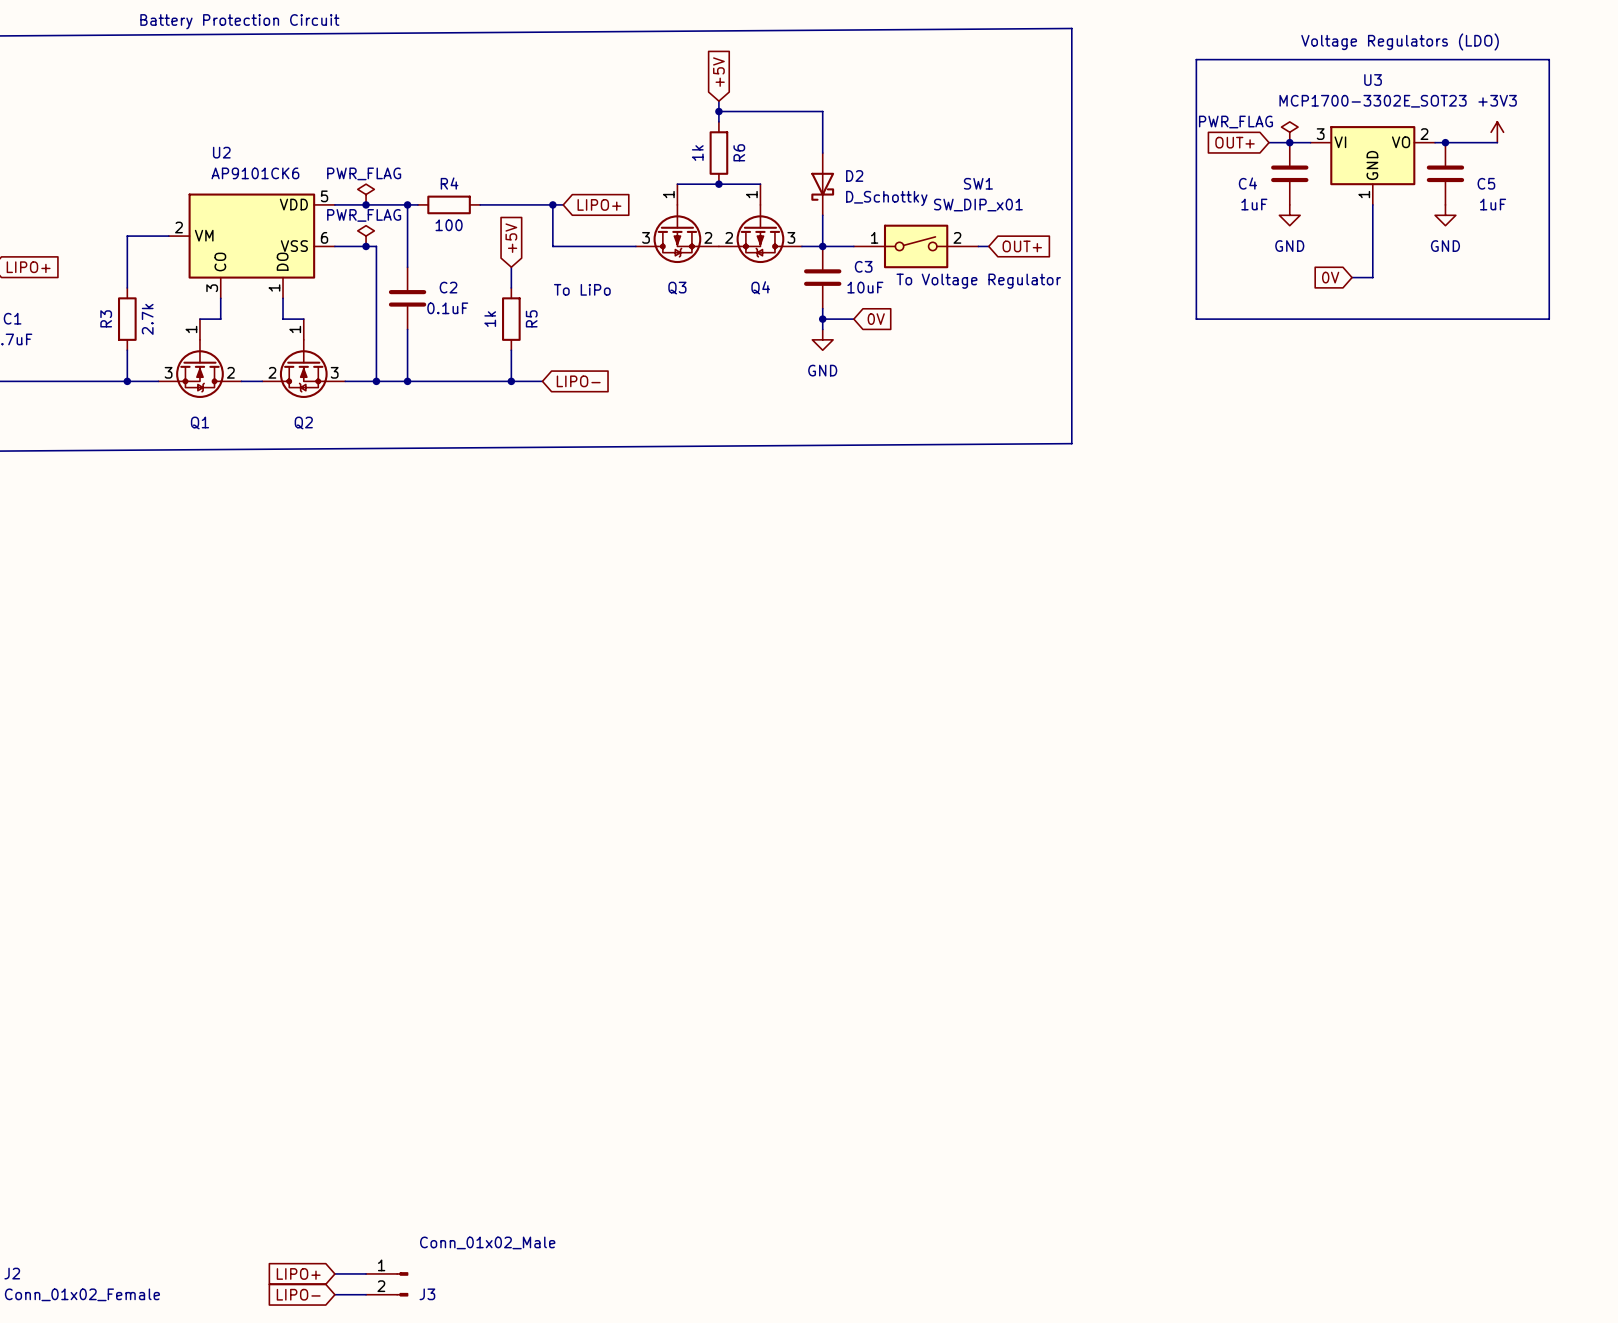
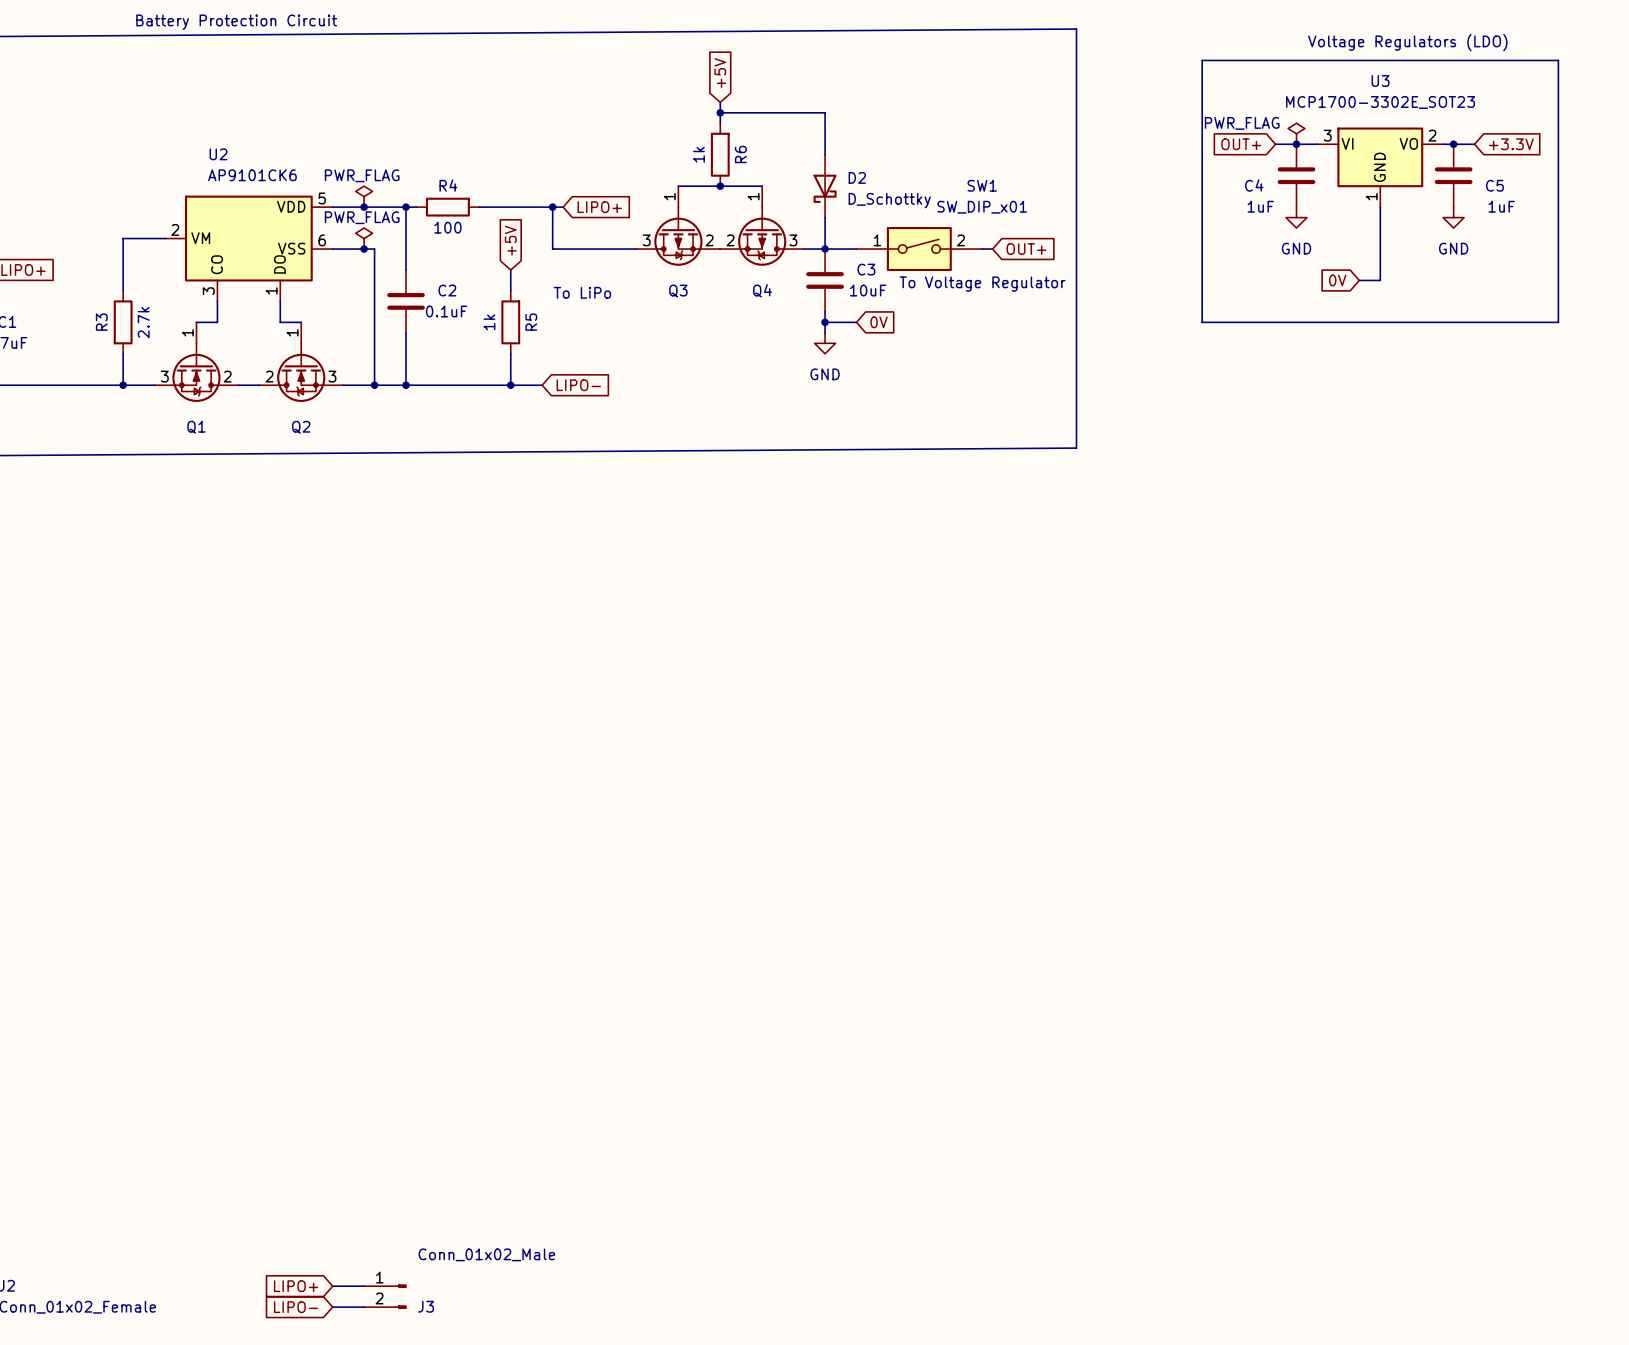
power symbol: +3V3 (1497, 132) -> none
wire: (1466, 142) (1497, 142) -> none
global label: none -> +3.3V (1511, 144)

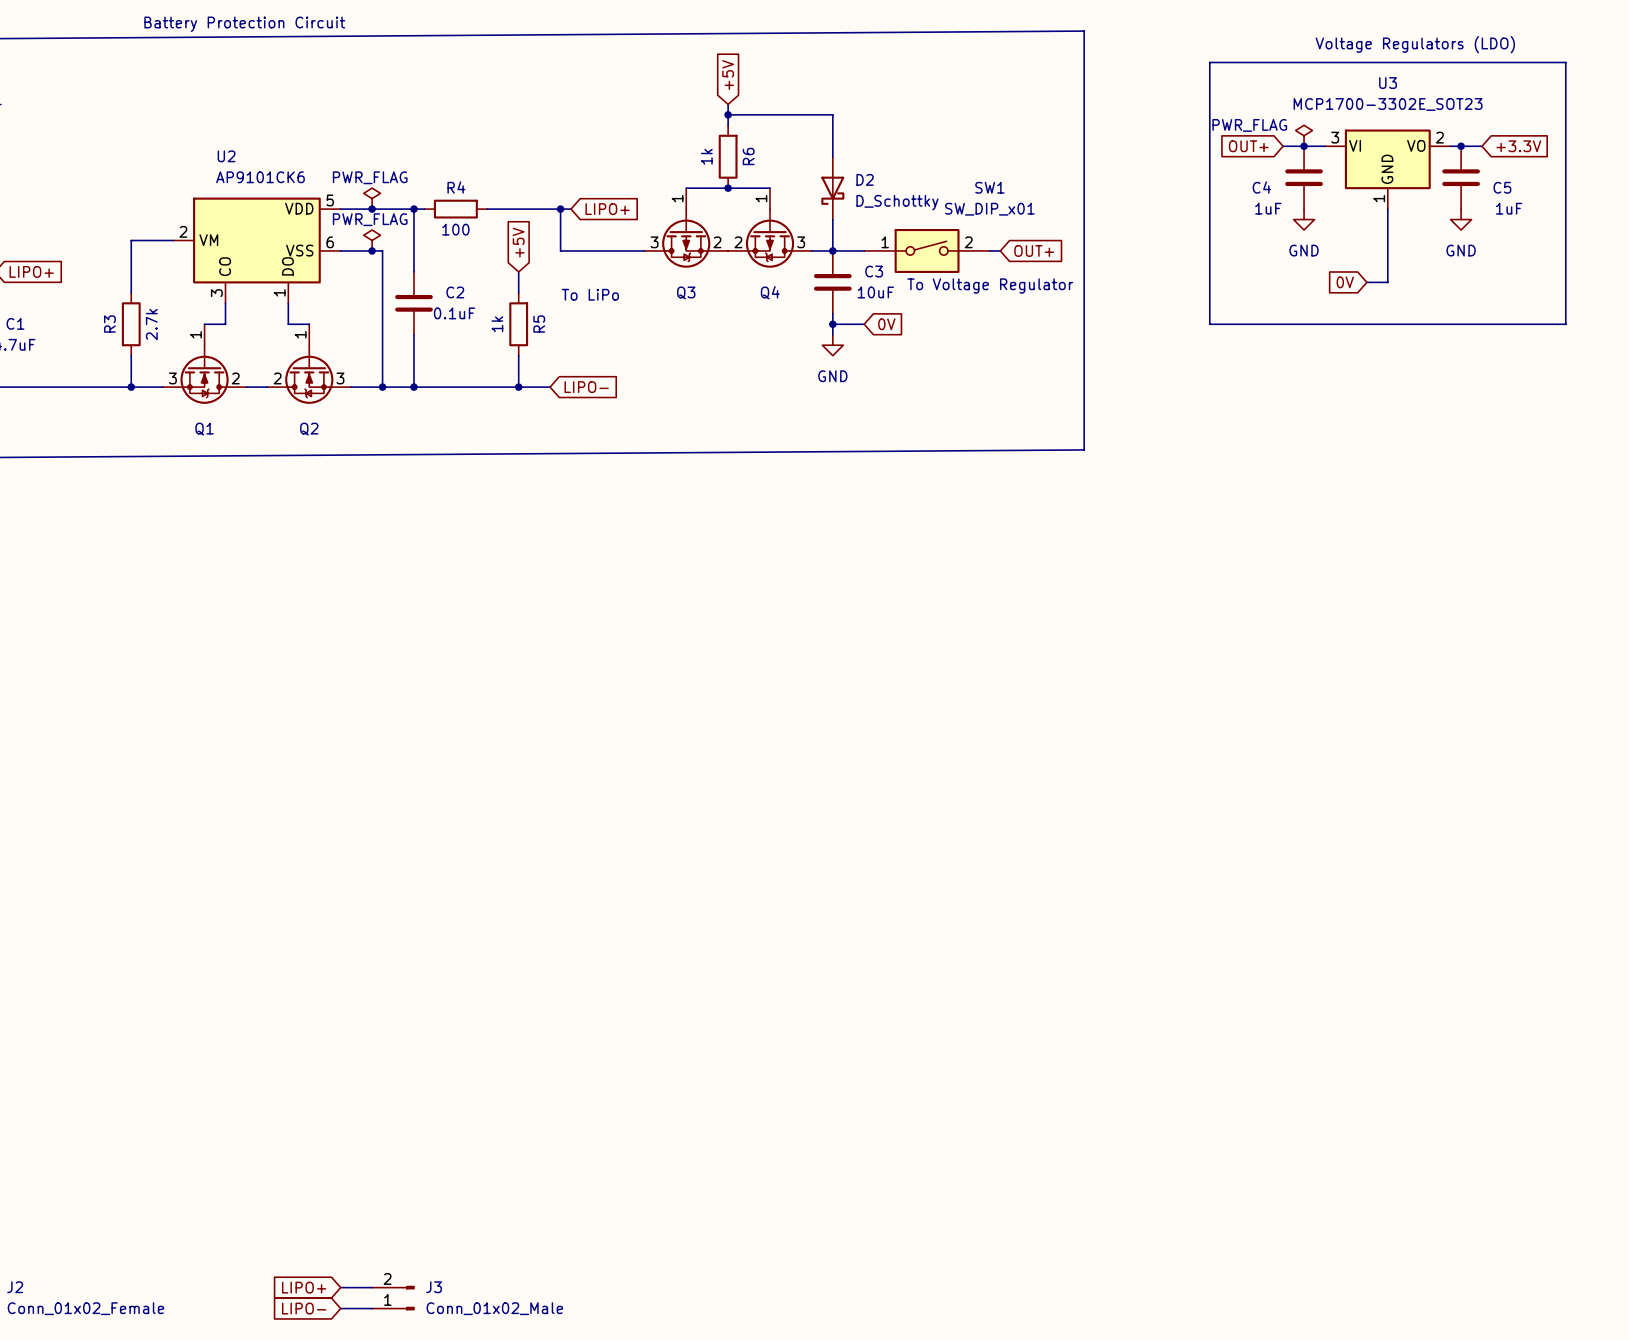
J3 value position: Conn_01x02_Male (486, 1254) -> Conn_01x02_Male (494, 1308)
J3 flip: as is (400, 1296) -> up-down (408, 1298)

